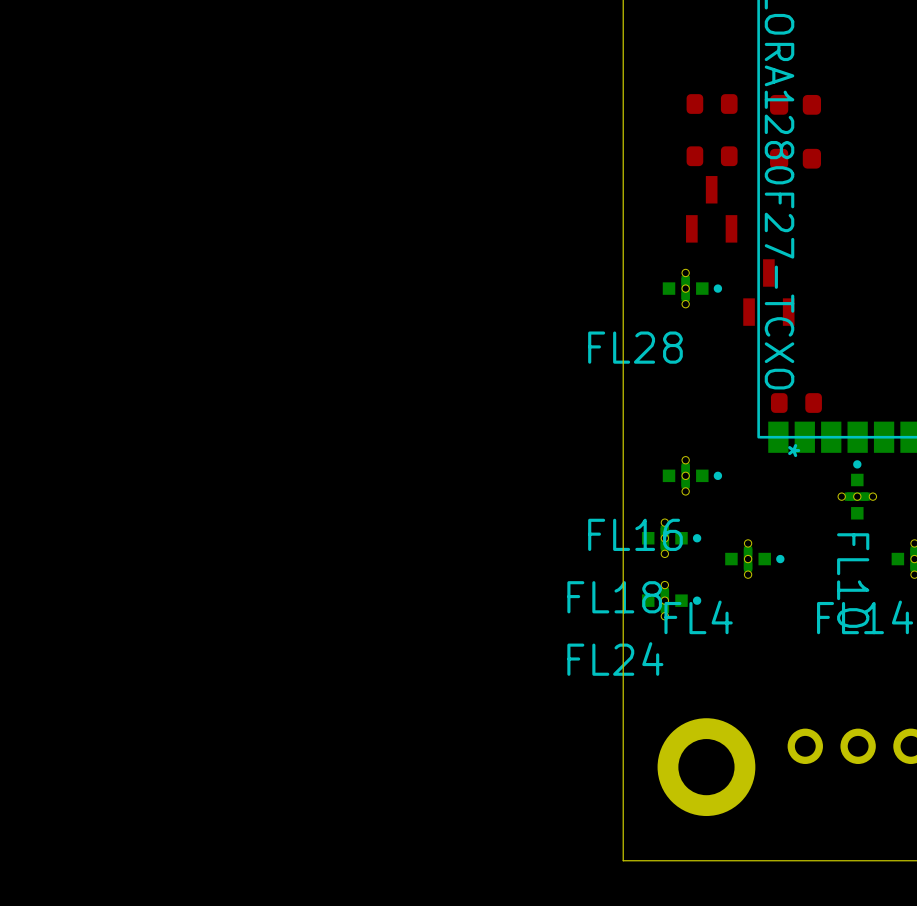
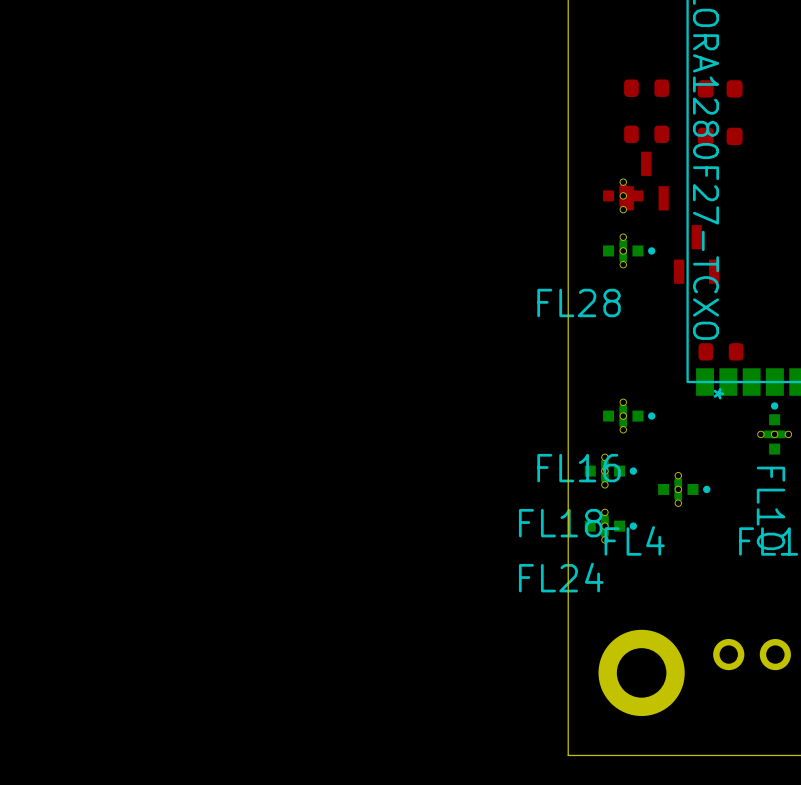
part: none -> (623, 195)

